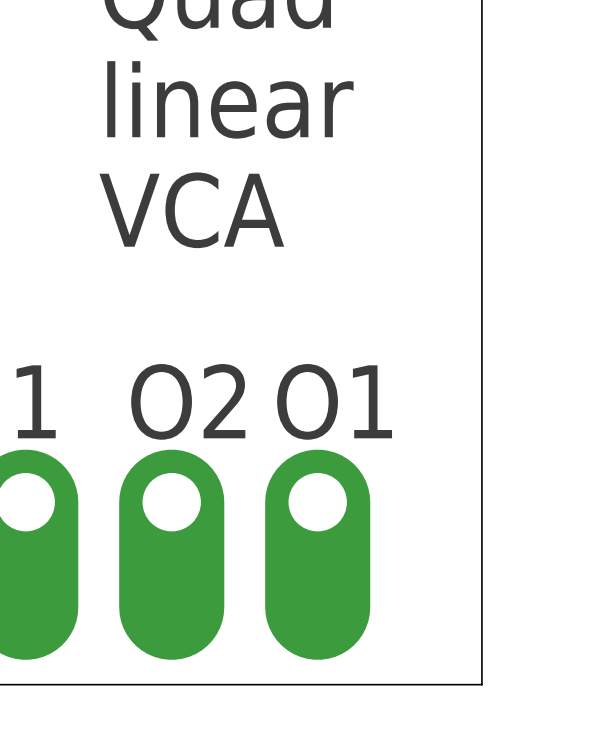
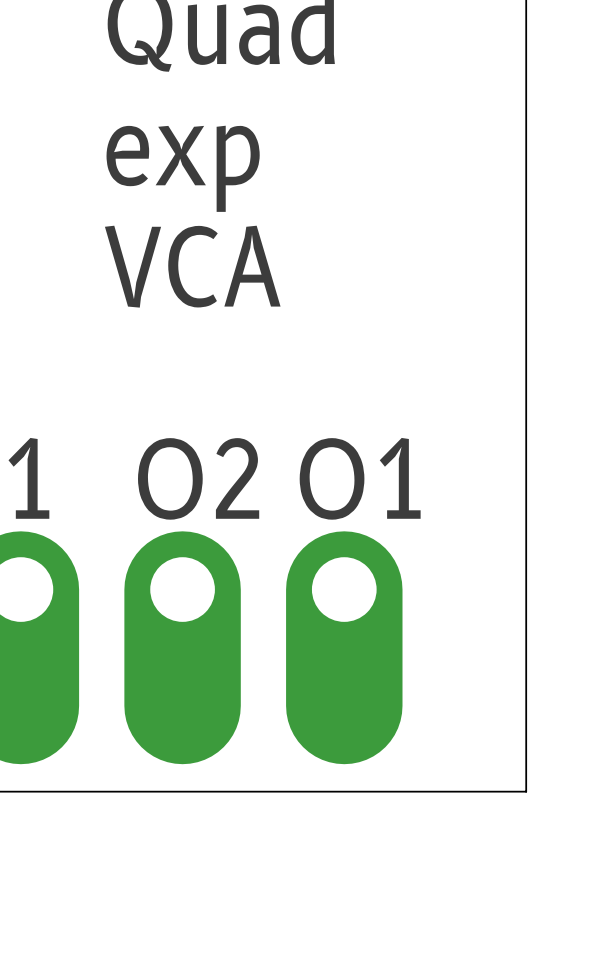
text: linear (230, 99) -> exp (183, 168)

